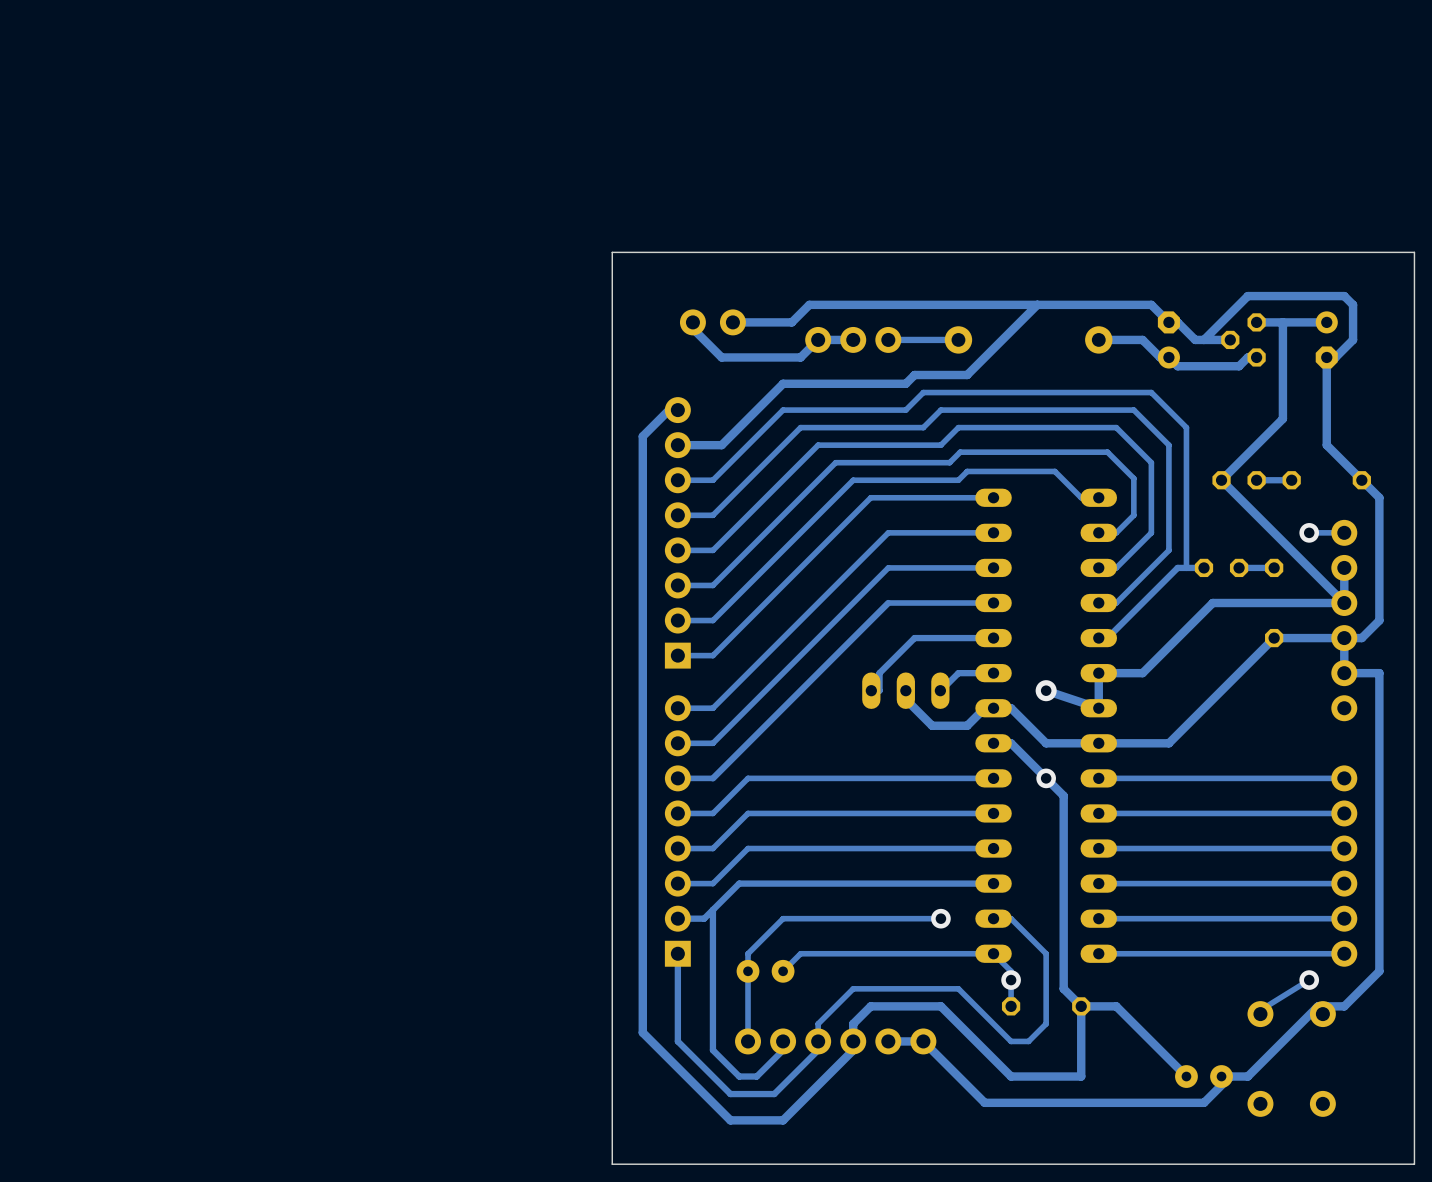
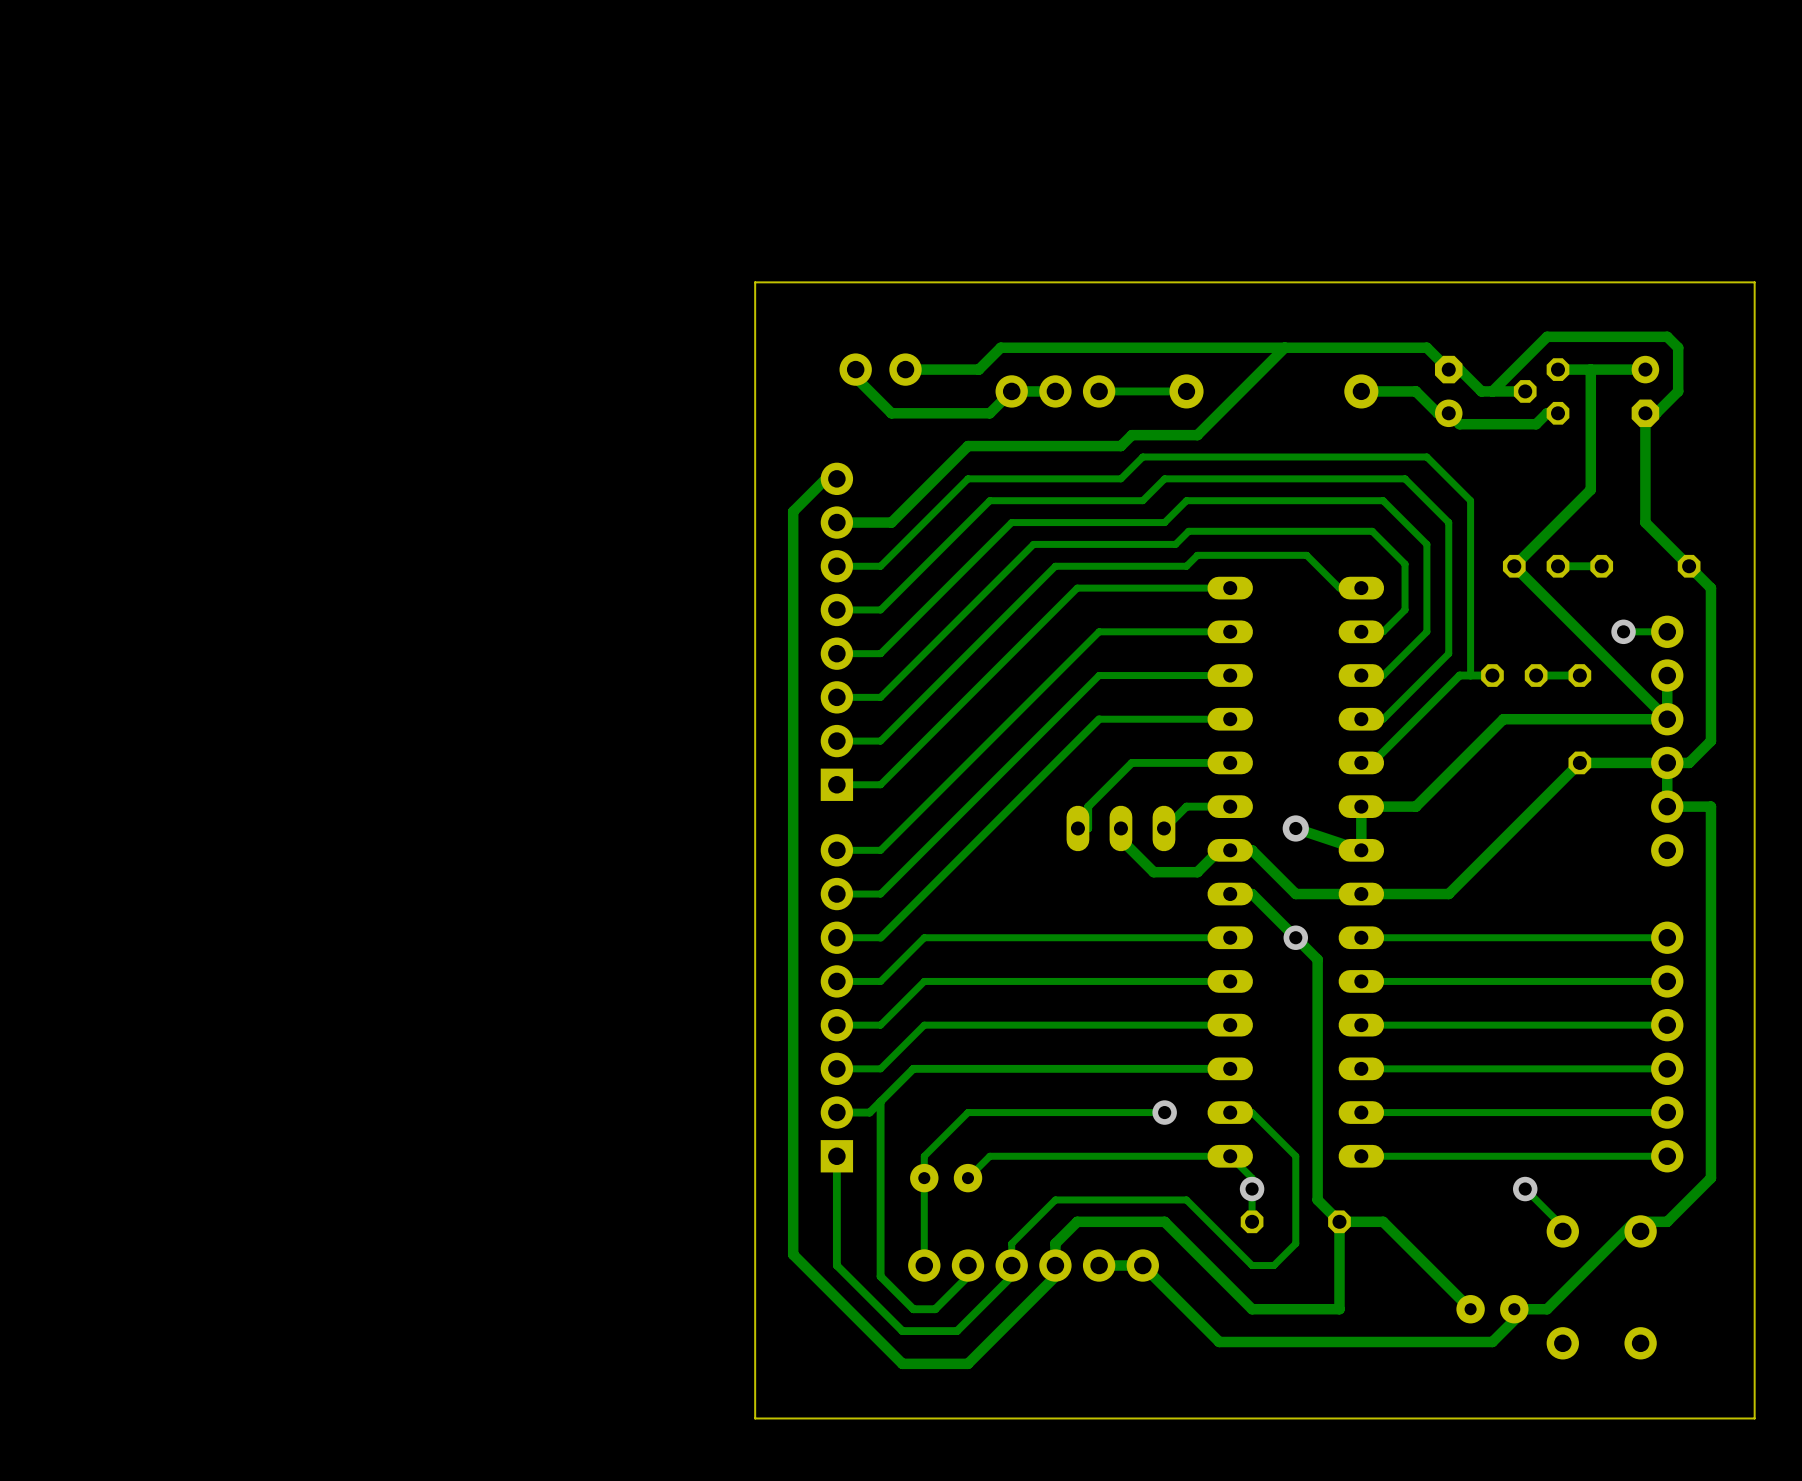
track: (1309, 980) (1260, 1010) -> (1525, 1189) (1562, 1226)
via position: (1309, 980) -> (1525, 1189)

